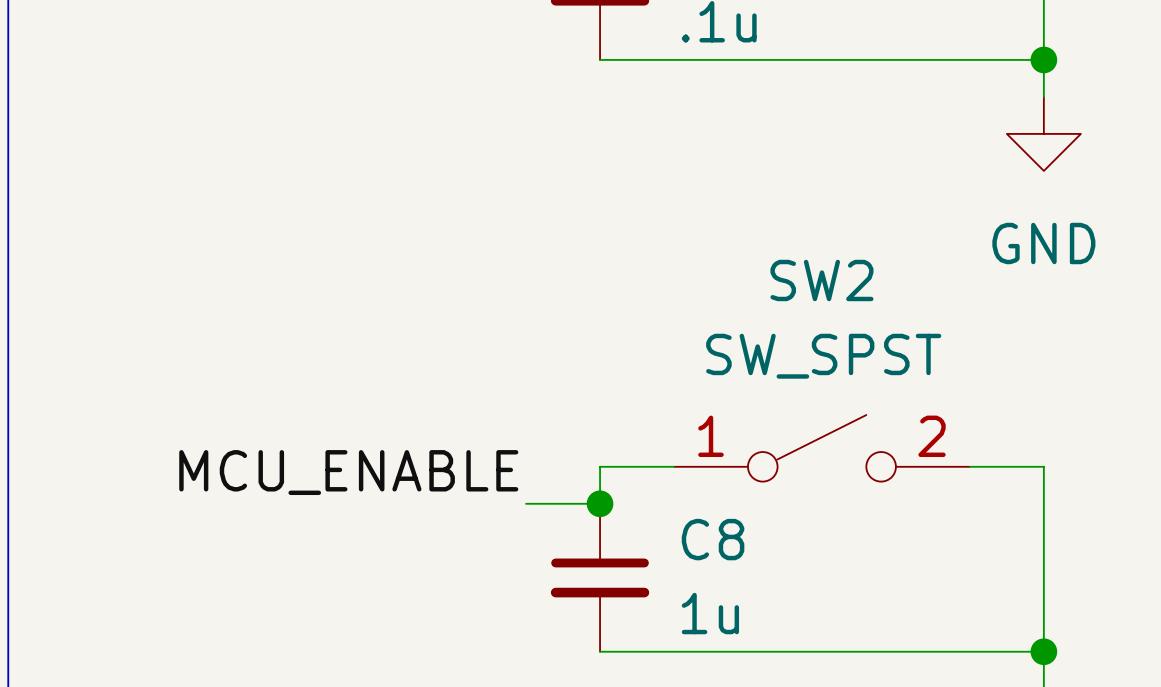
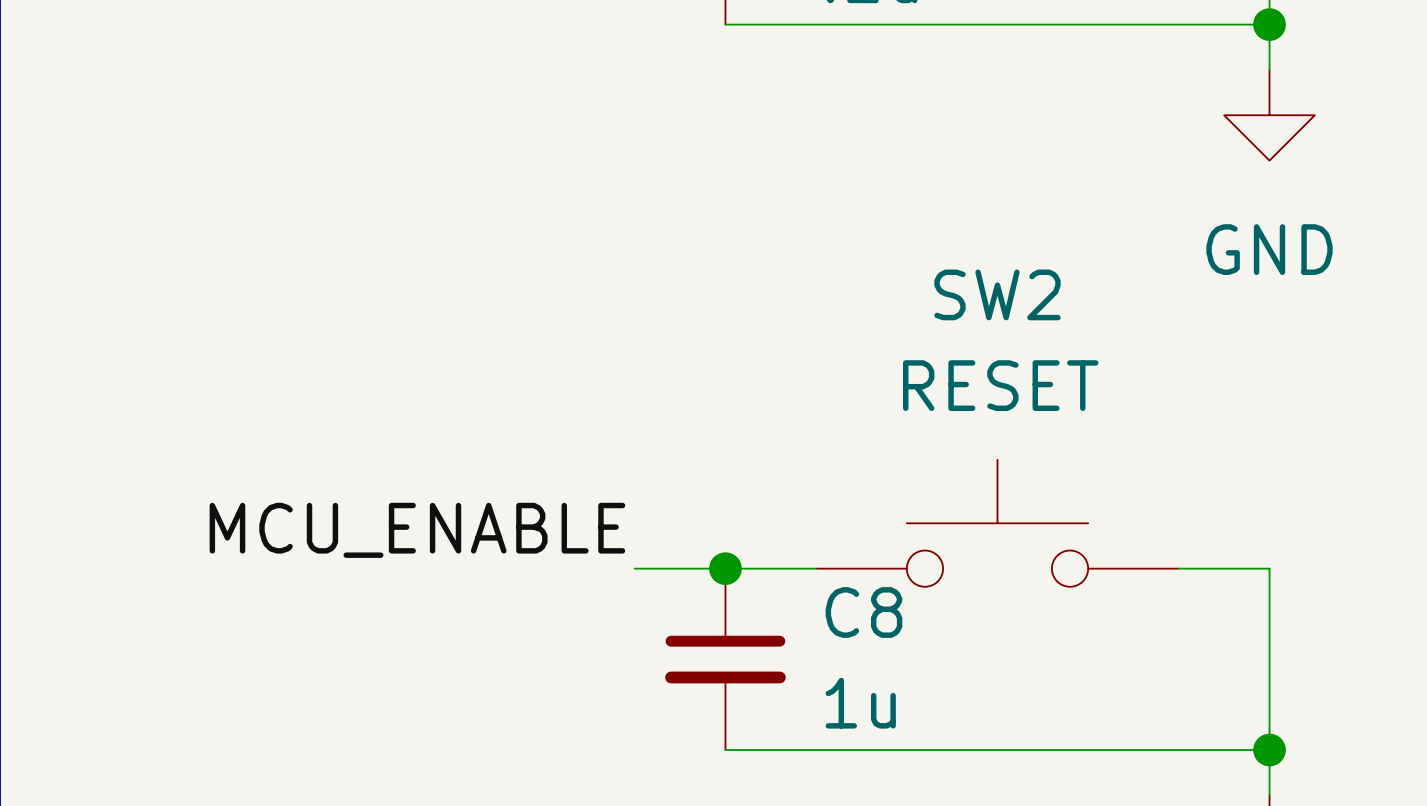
SW2 value: SW_SPST (823, 356) -> RESET (1000, 385)
SW2 symbol: [674, 415, 970, 482] -> [816, 459, 1179, 587]
wire: (674, 466) (600, 466) (600, 503) -> (816, 568) (725, 568)
wire: (969, 466) (1043, 466) (1043, 503) -> (1178, 568) (1269, 568)

